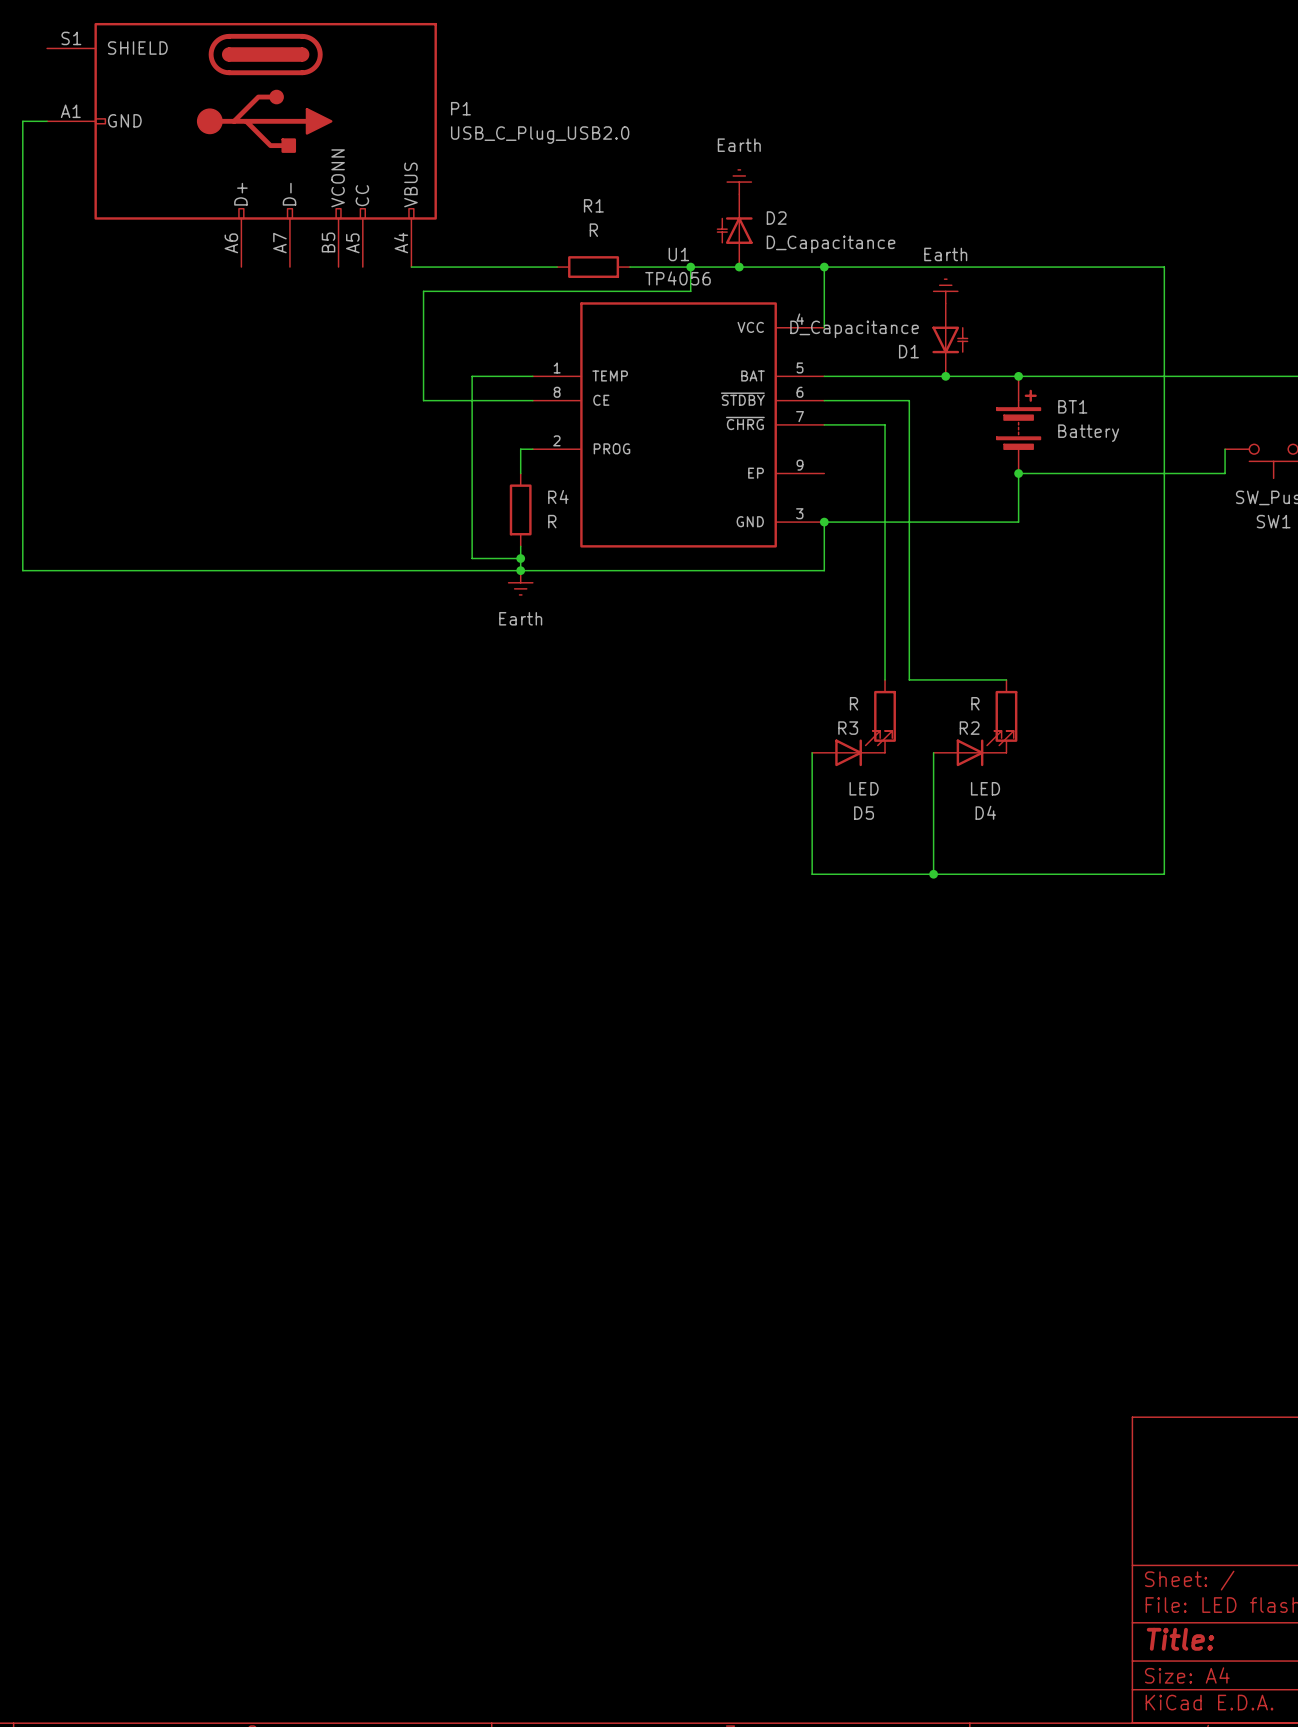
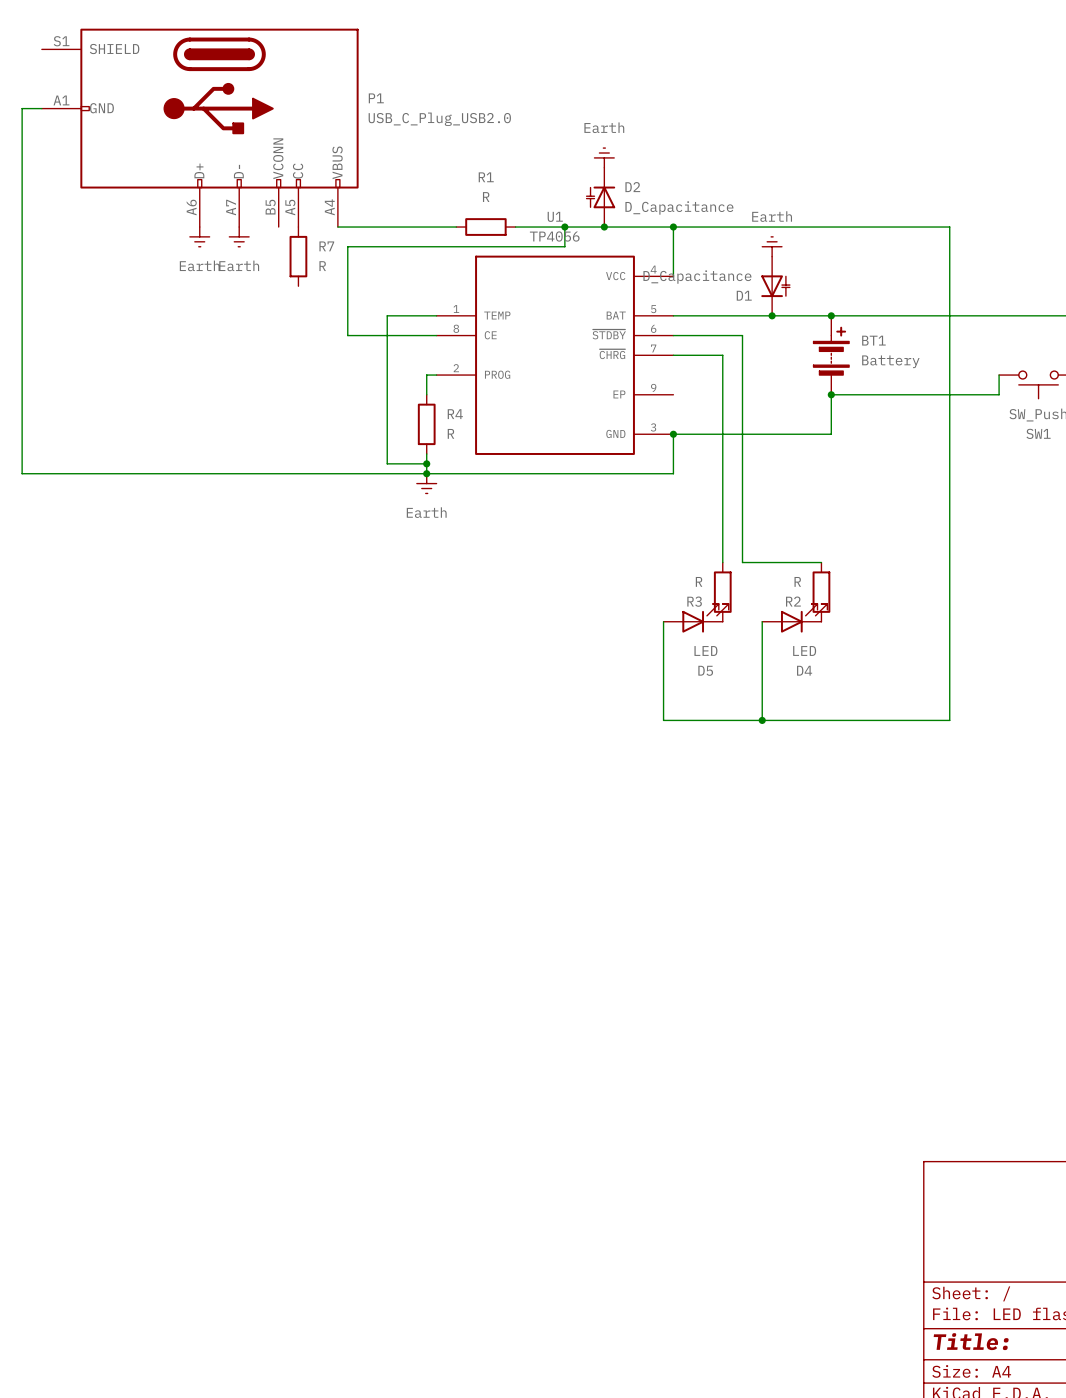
power symbol: none -> Earth (199, 236)
power symbol: none -> Earth (239, 236)
R7: none -> R (298, 256)

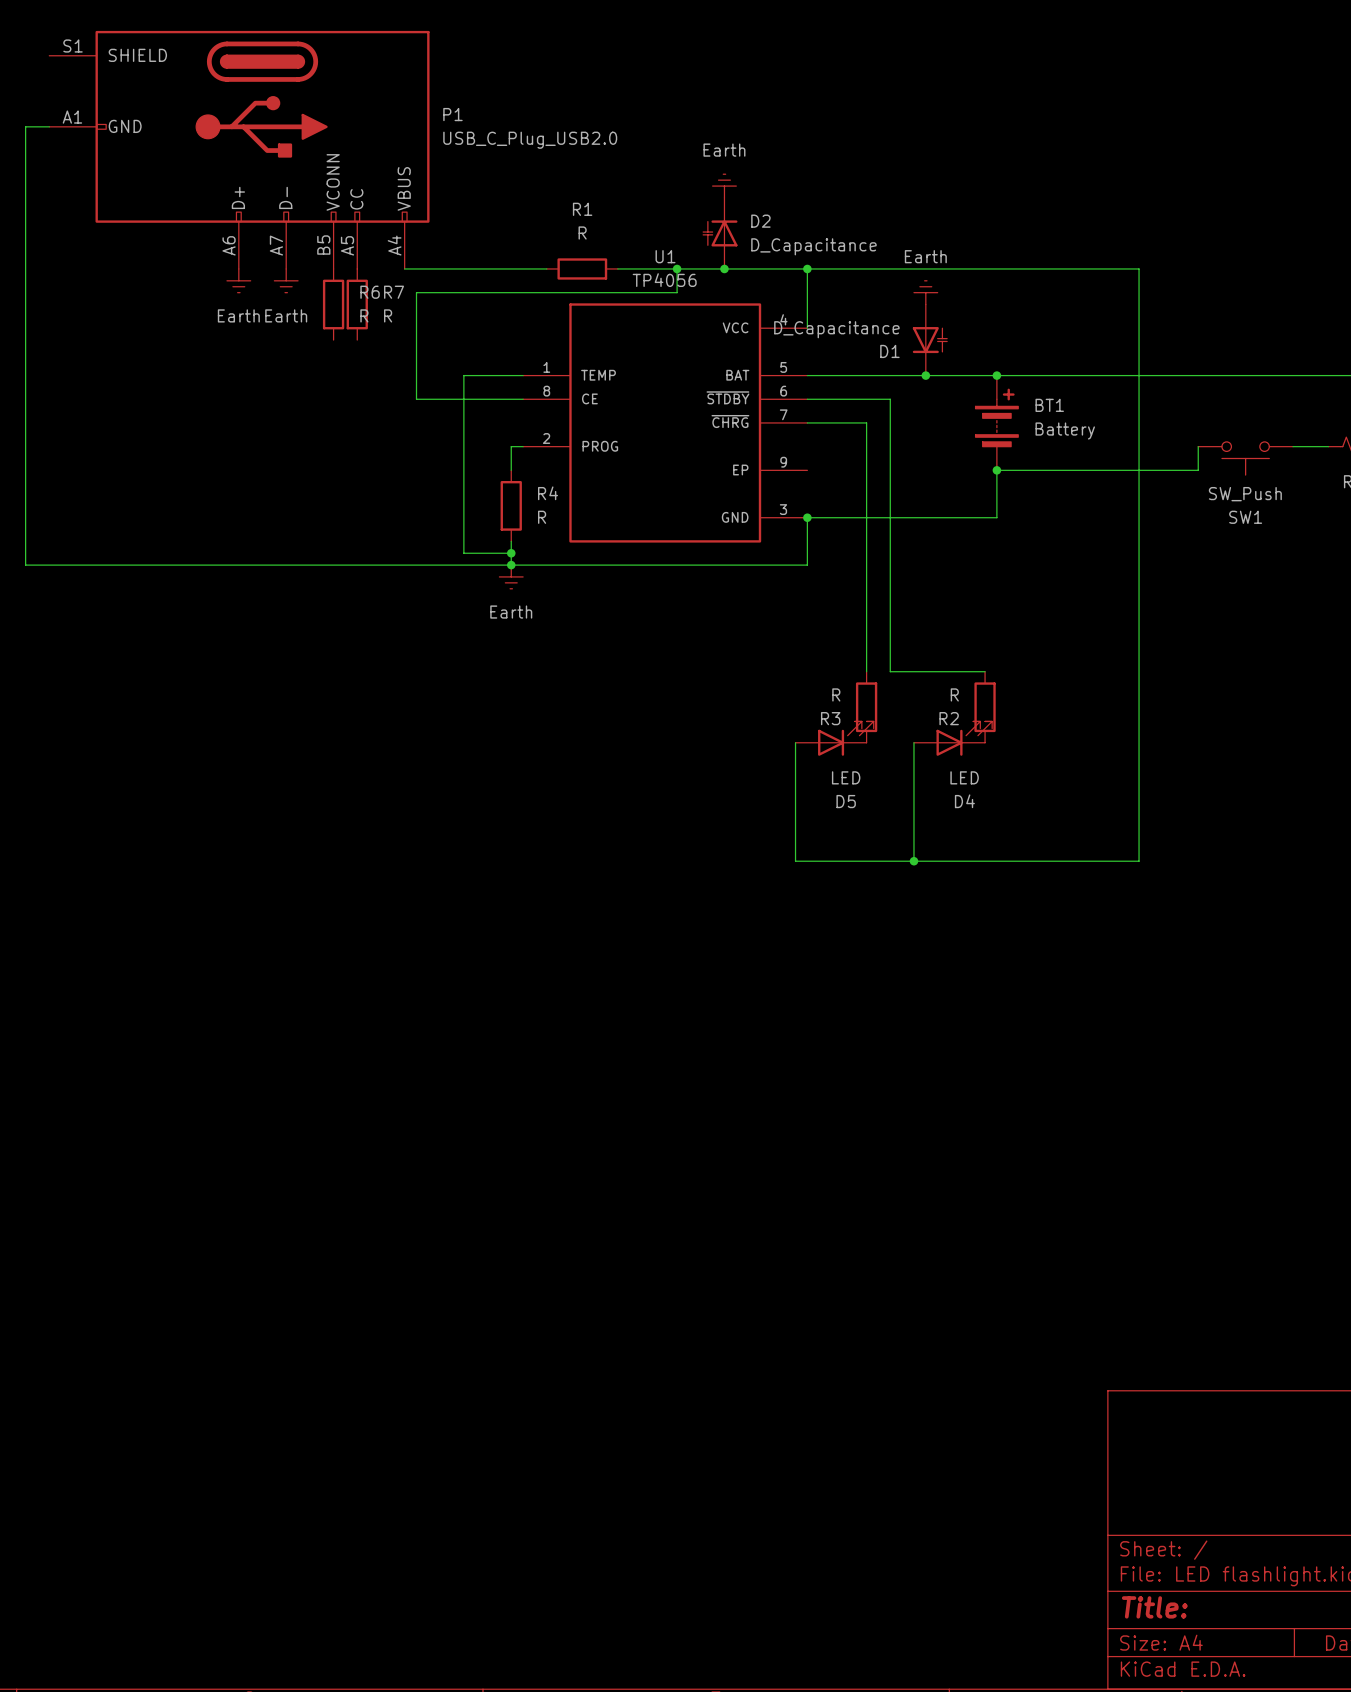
R6: none -> R (333, 304)

